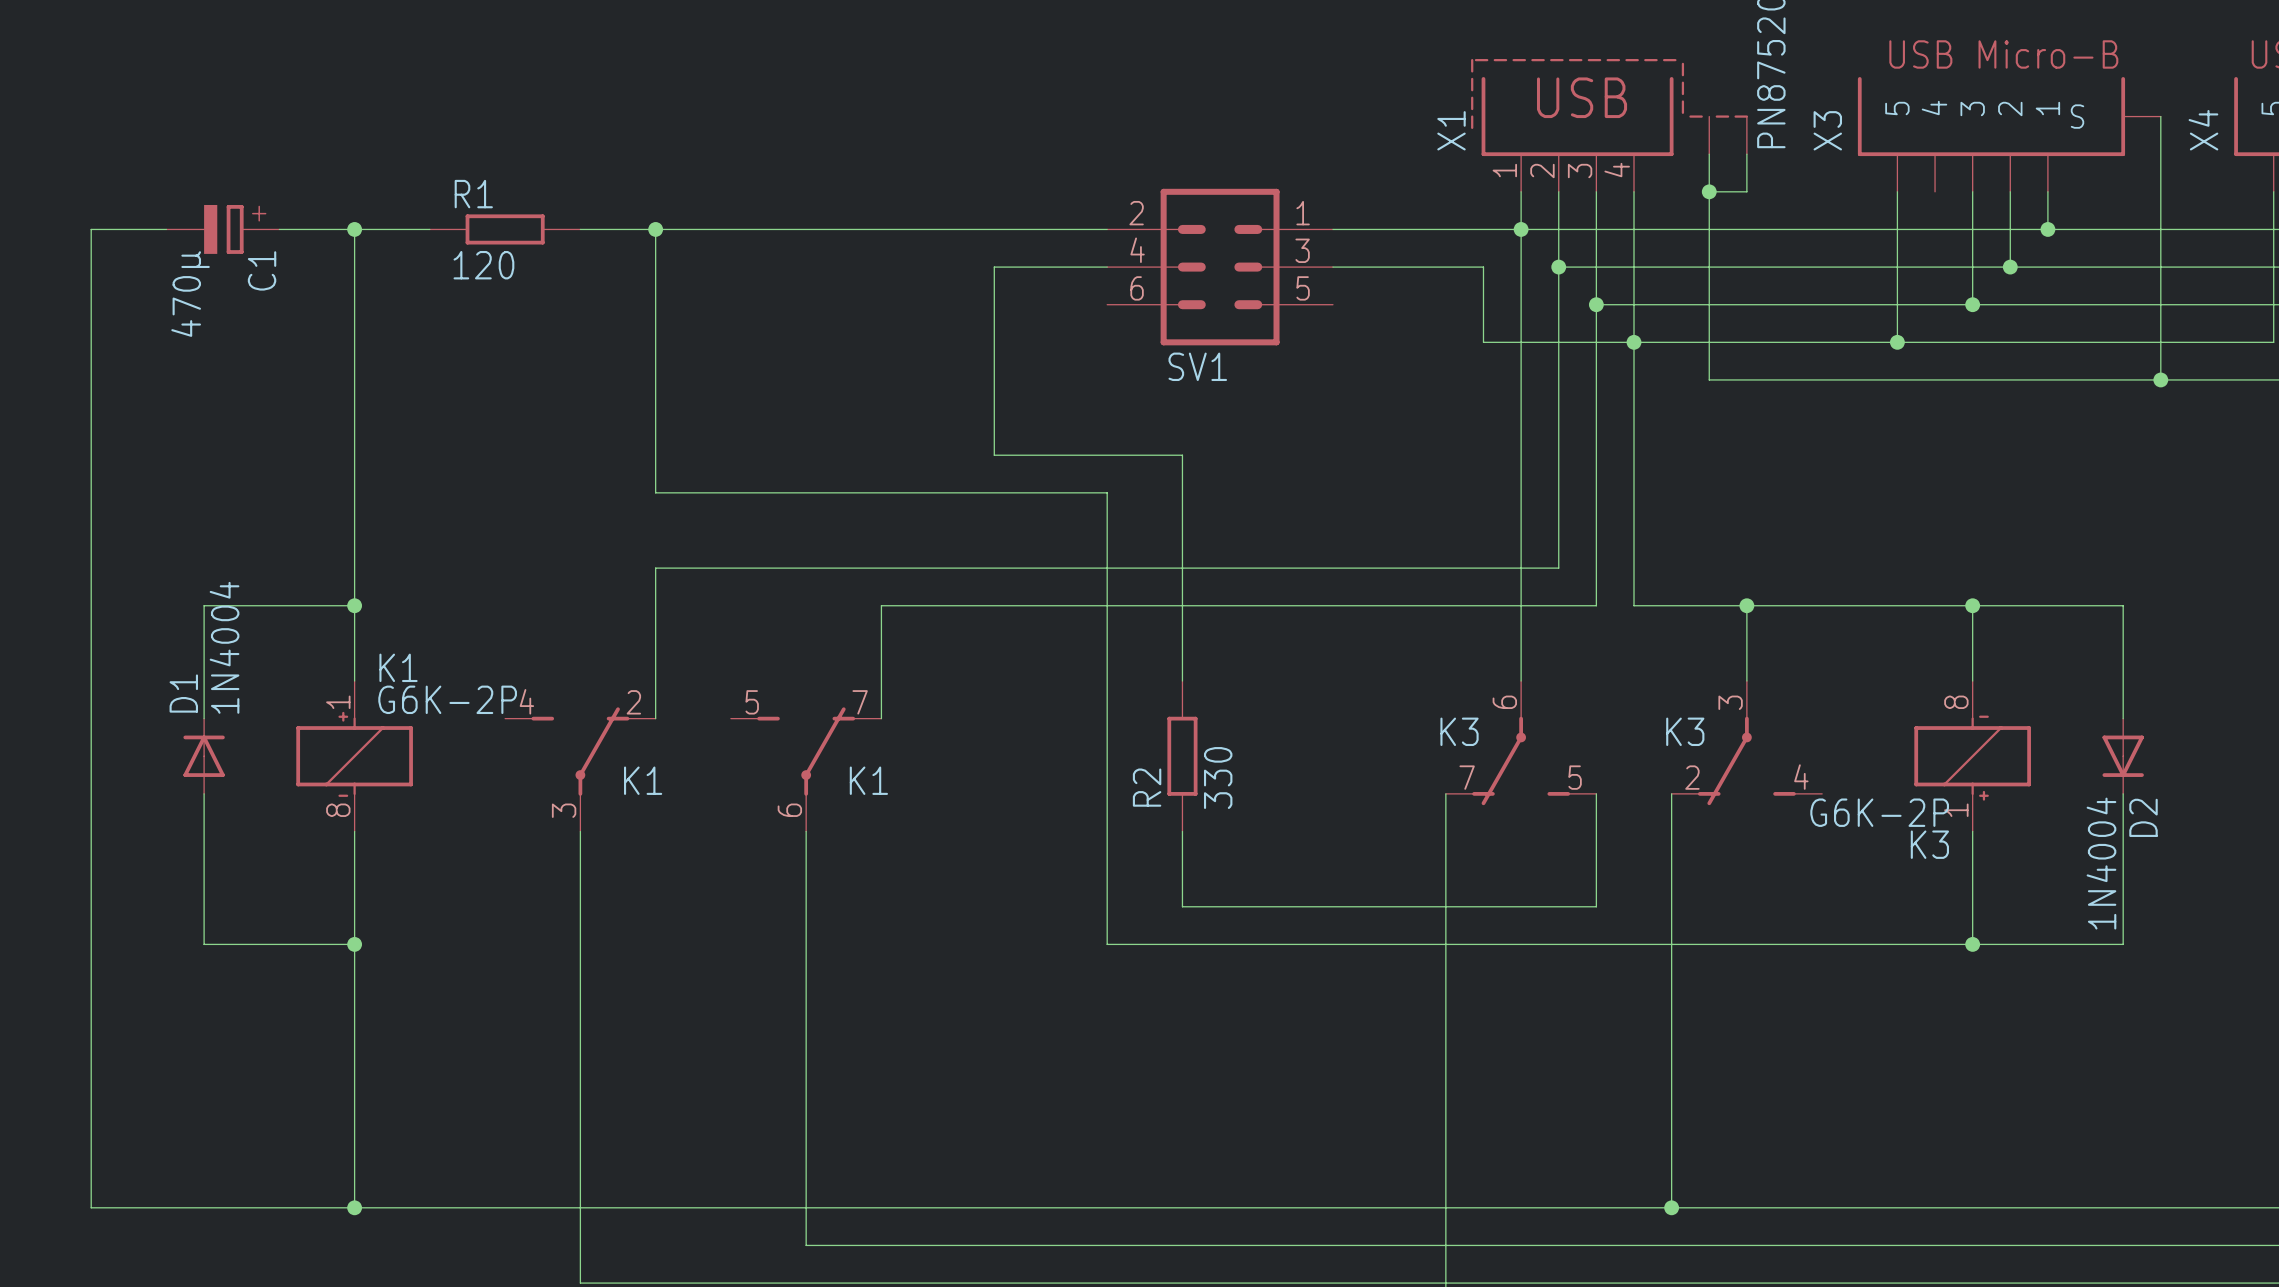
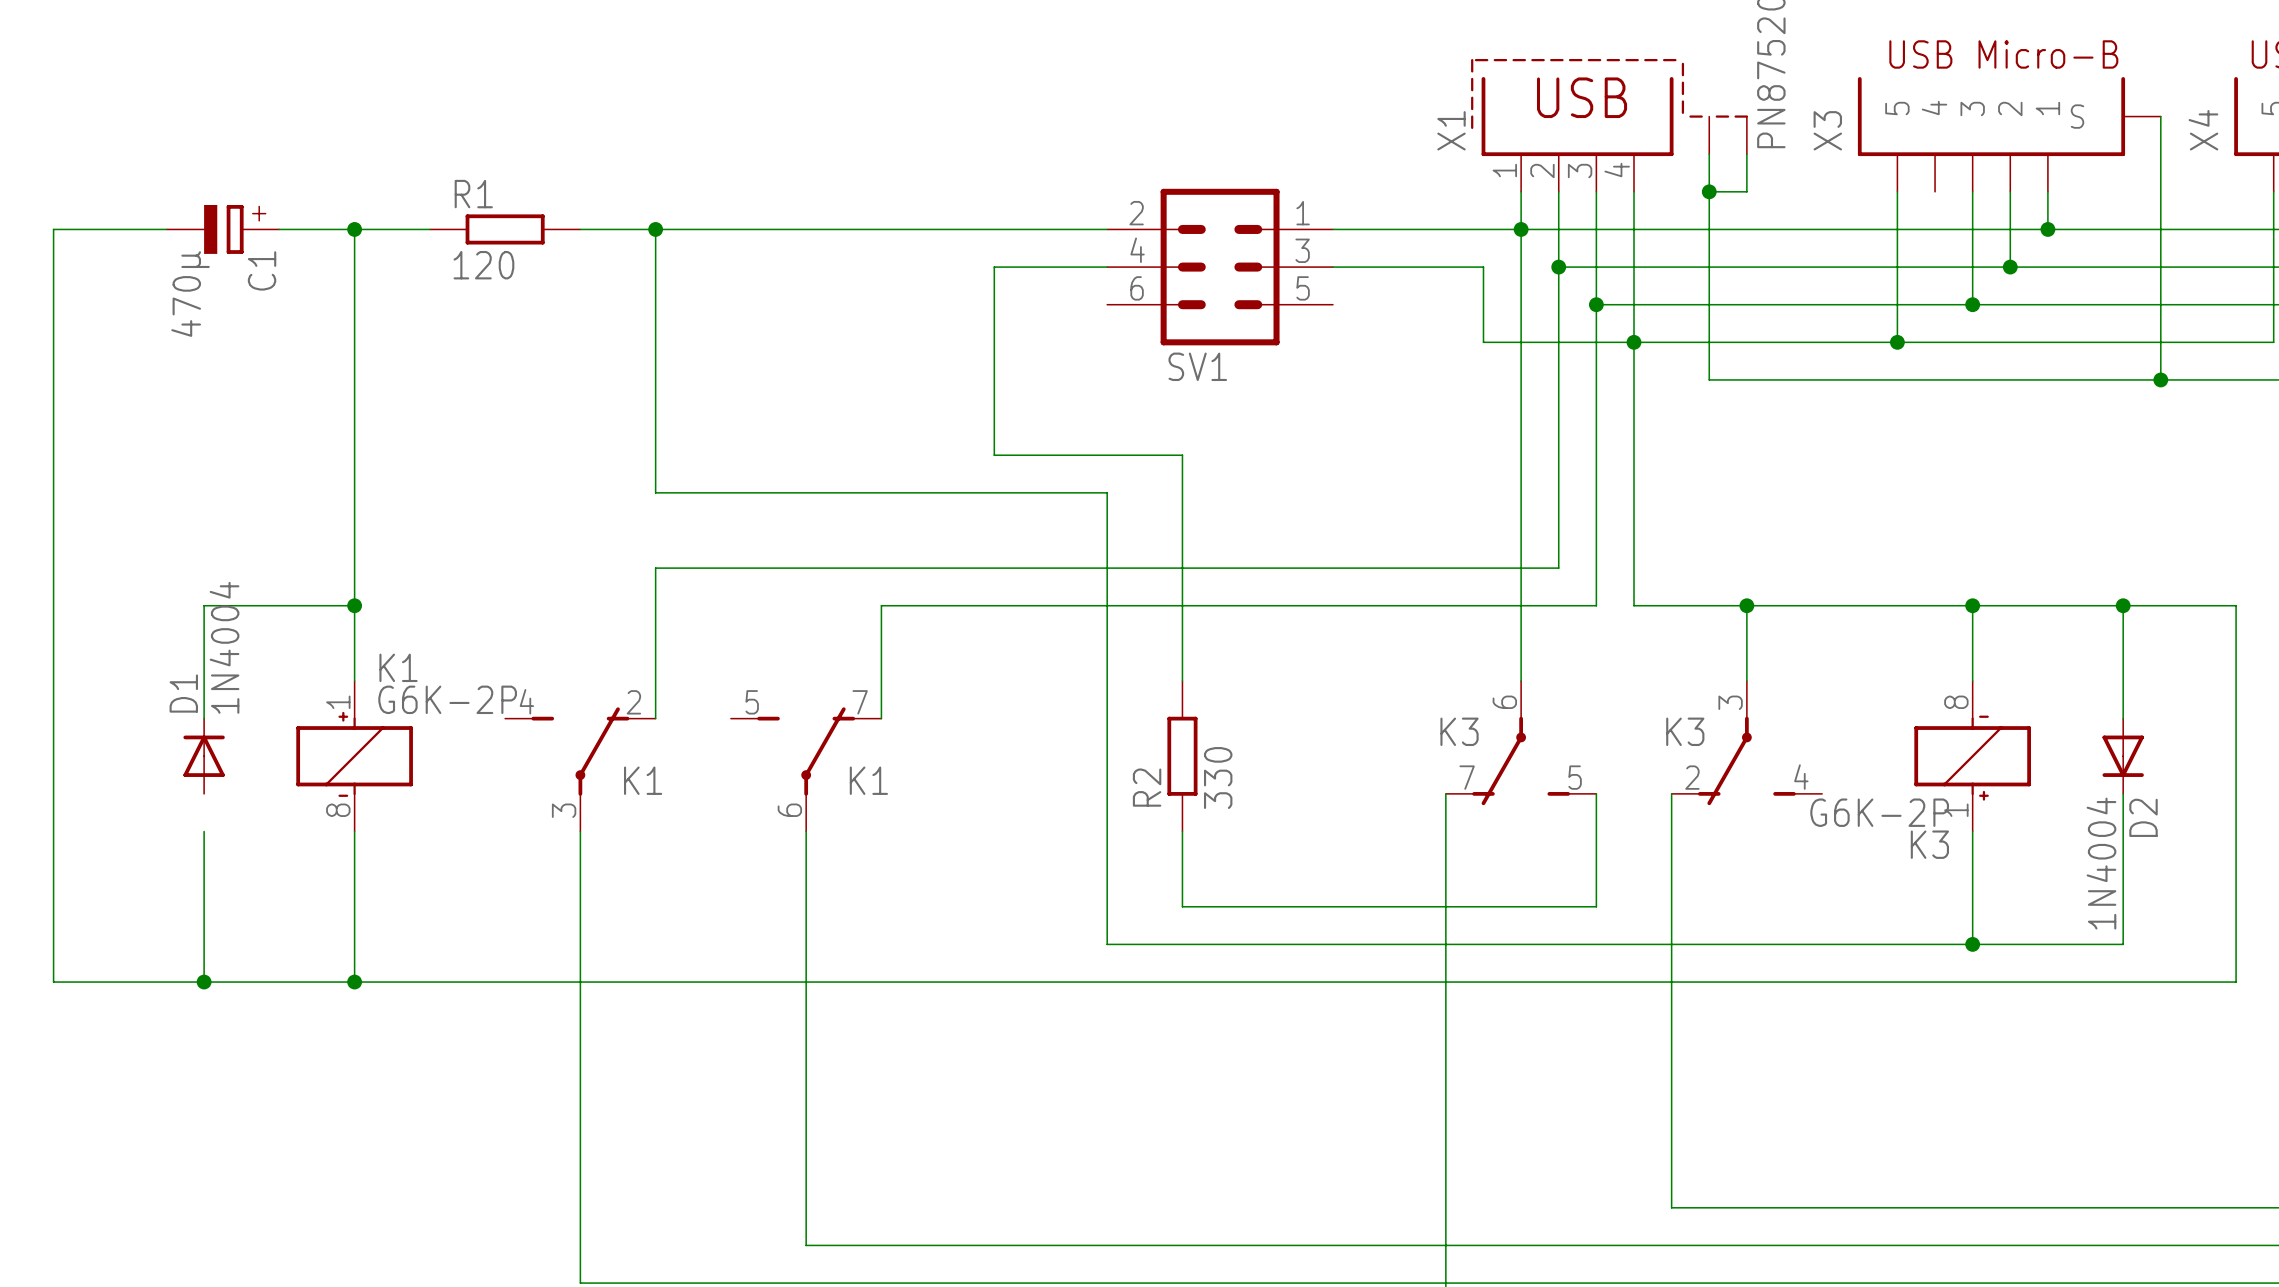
wire: (91, 229) (91, 1207) (1671, 1207) -> (91, 229) (53, 229) (53, 982) (2236, 982) (2236, 605) (2123, 605)
junction: none -> (2123, 605)
wire: (204, 793) (204, 831) -> none
wire: (204, 944) (354, 944) -> (204, 944) (204, 982)
junction position: (354, 944) -> (354, 982)
junction: none -> (204, 982)
wire: (354, 982) (354, 1207) -> none
junction: (354, 1207) -> none
junction: (1671, 1207) -> none

